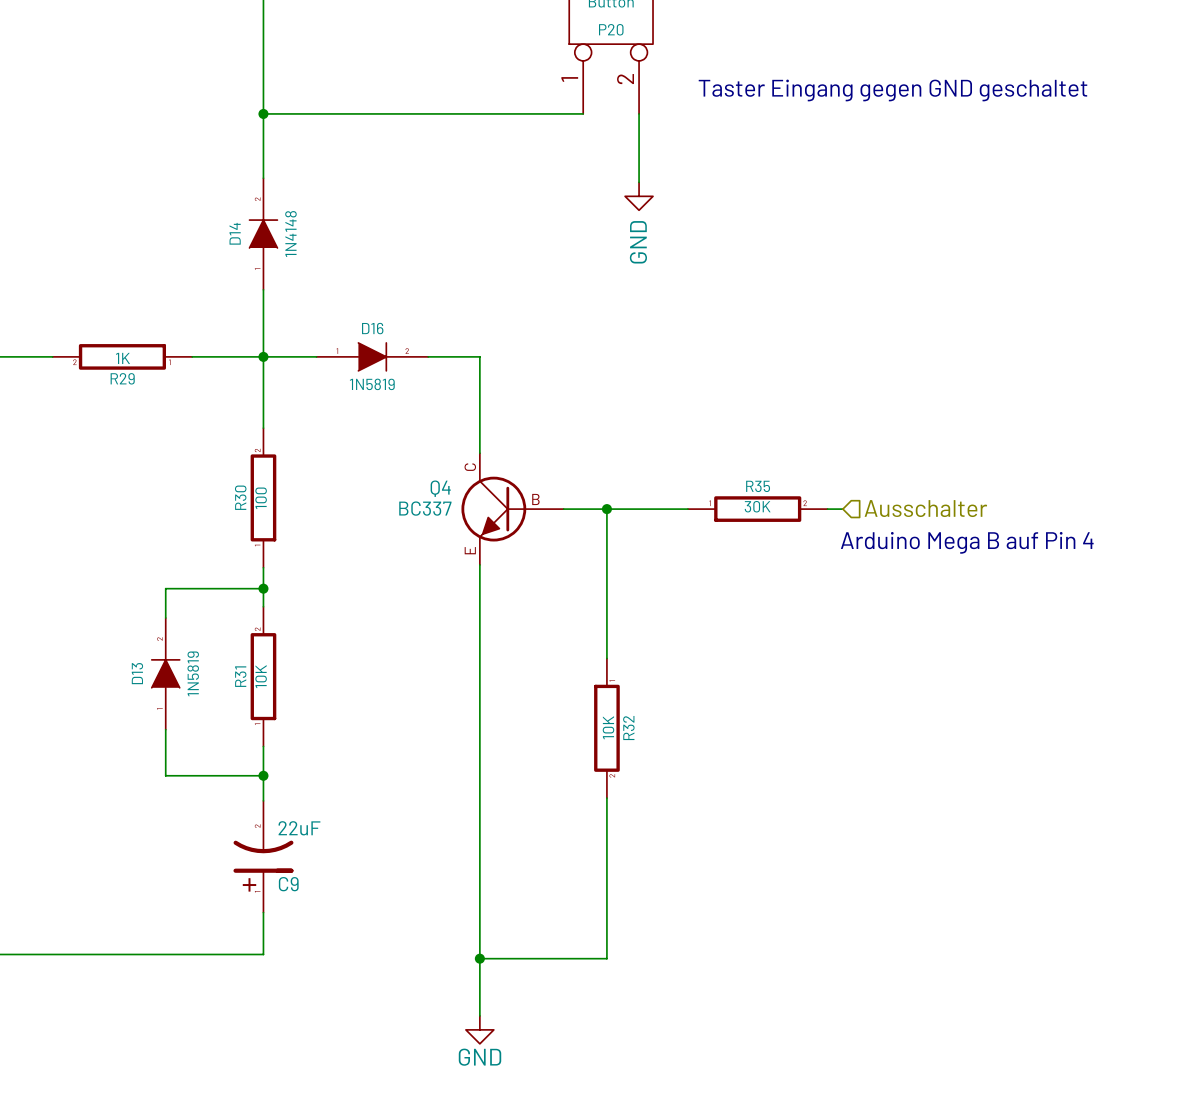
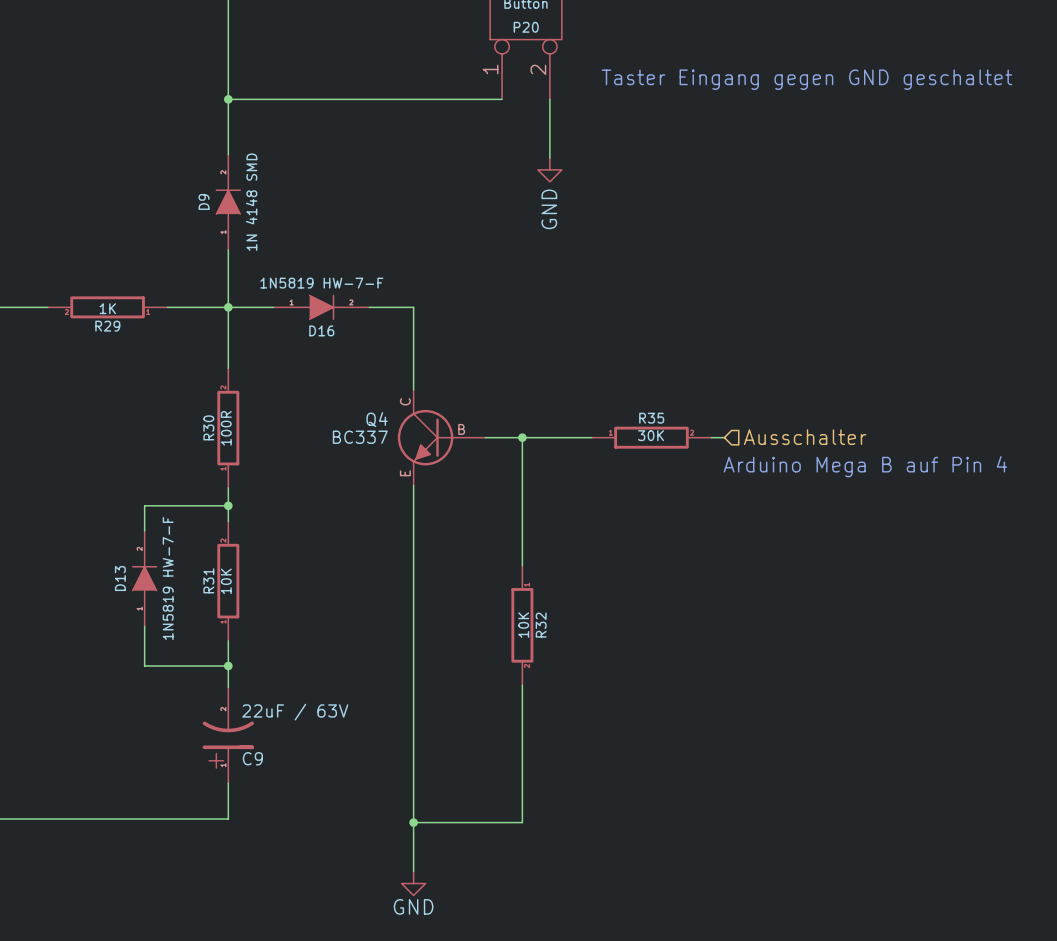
D14 name: D14 (235, 233) -> D9 (204, 201)
D14 value: 1N4148 (290, 234) -> 1N 4148 SMD (251, 202)
D16 name position: D16 (372, 328) -> D16 (321, 330)
D16 value: 1N5819 (372, 384) -> 1N5819 HW-7-F (321, 283)
R30 value: 100 (261, 498) -> 100R (226, 428)
D13 value: 1N5819 (193, 673) -> 1N5819 HW-7-F (168, 578)
C9 value: 22uF (299, 828) -> 22uF / 63V (295, 712)

